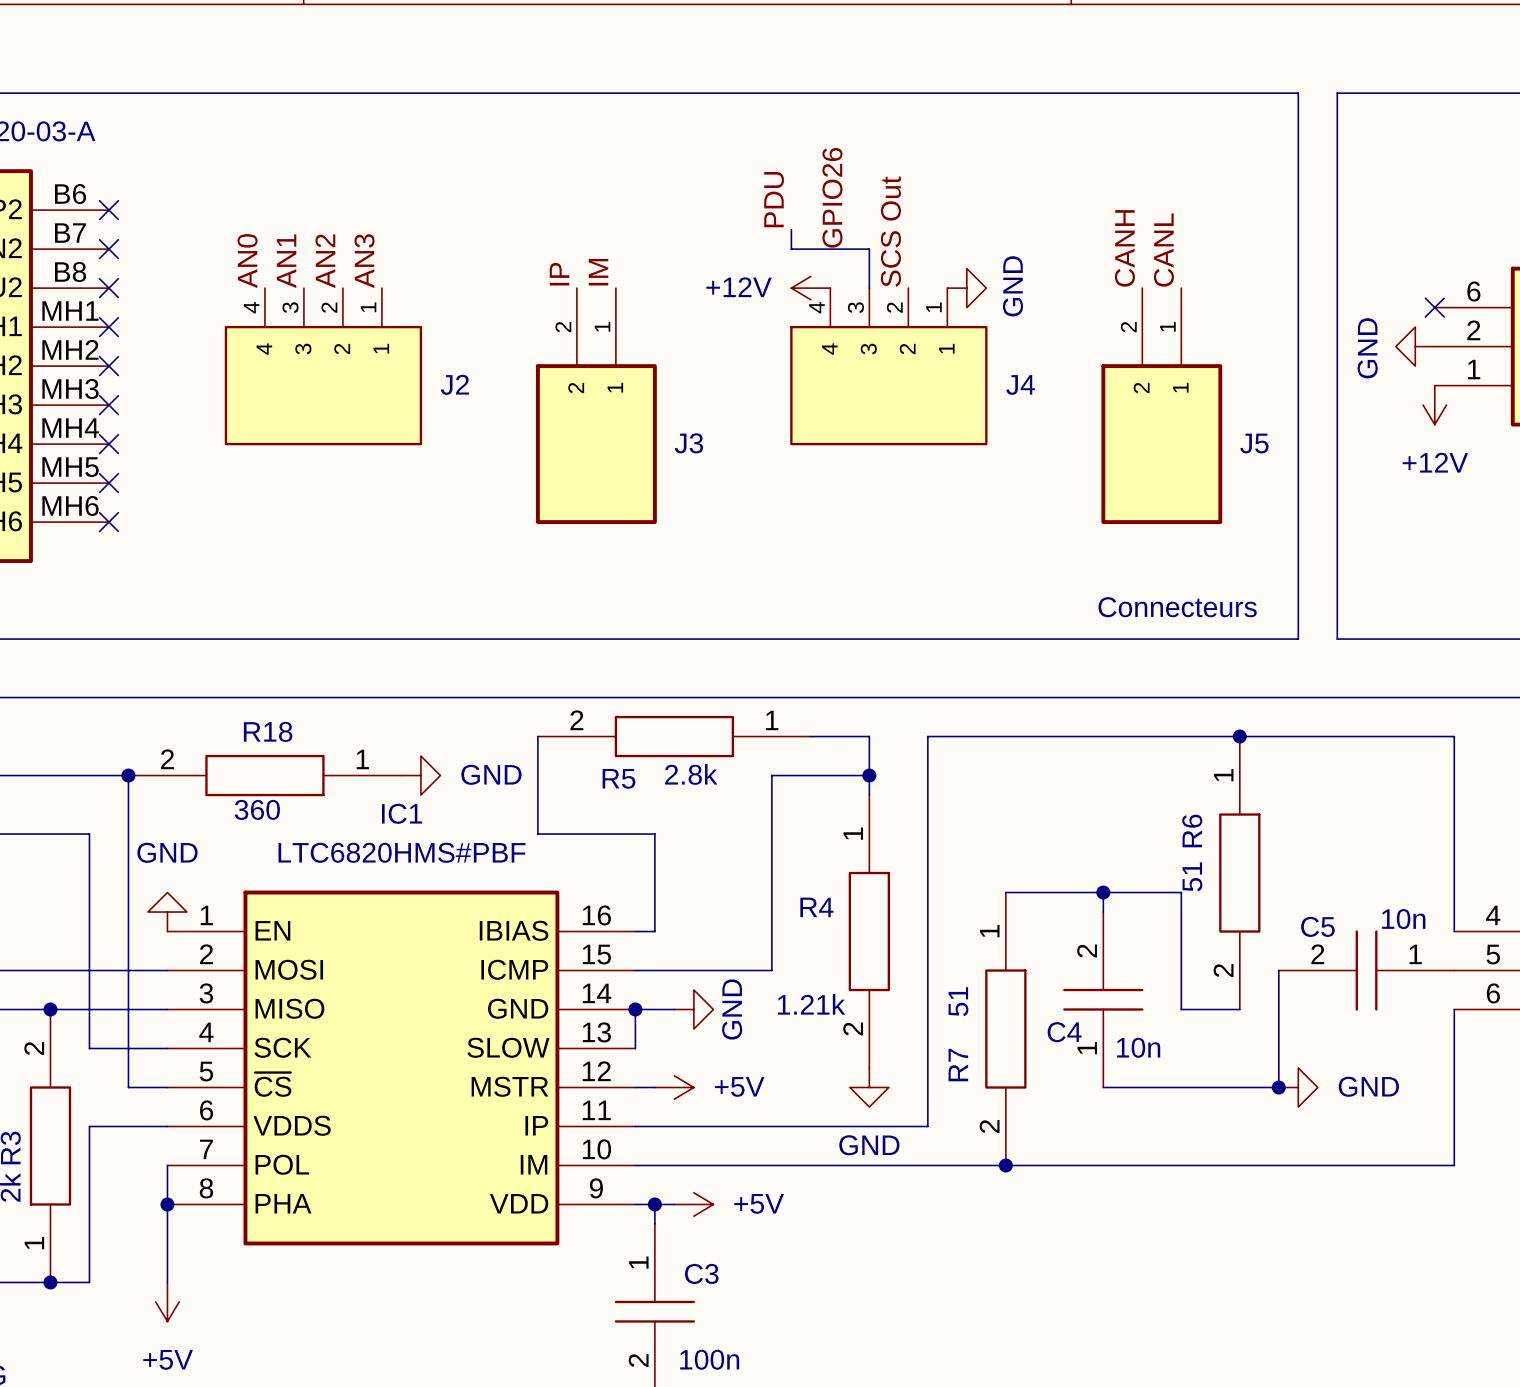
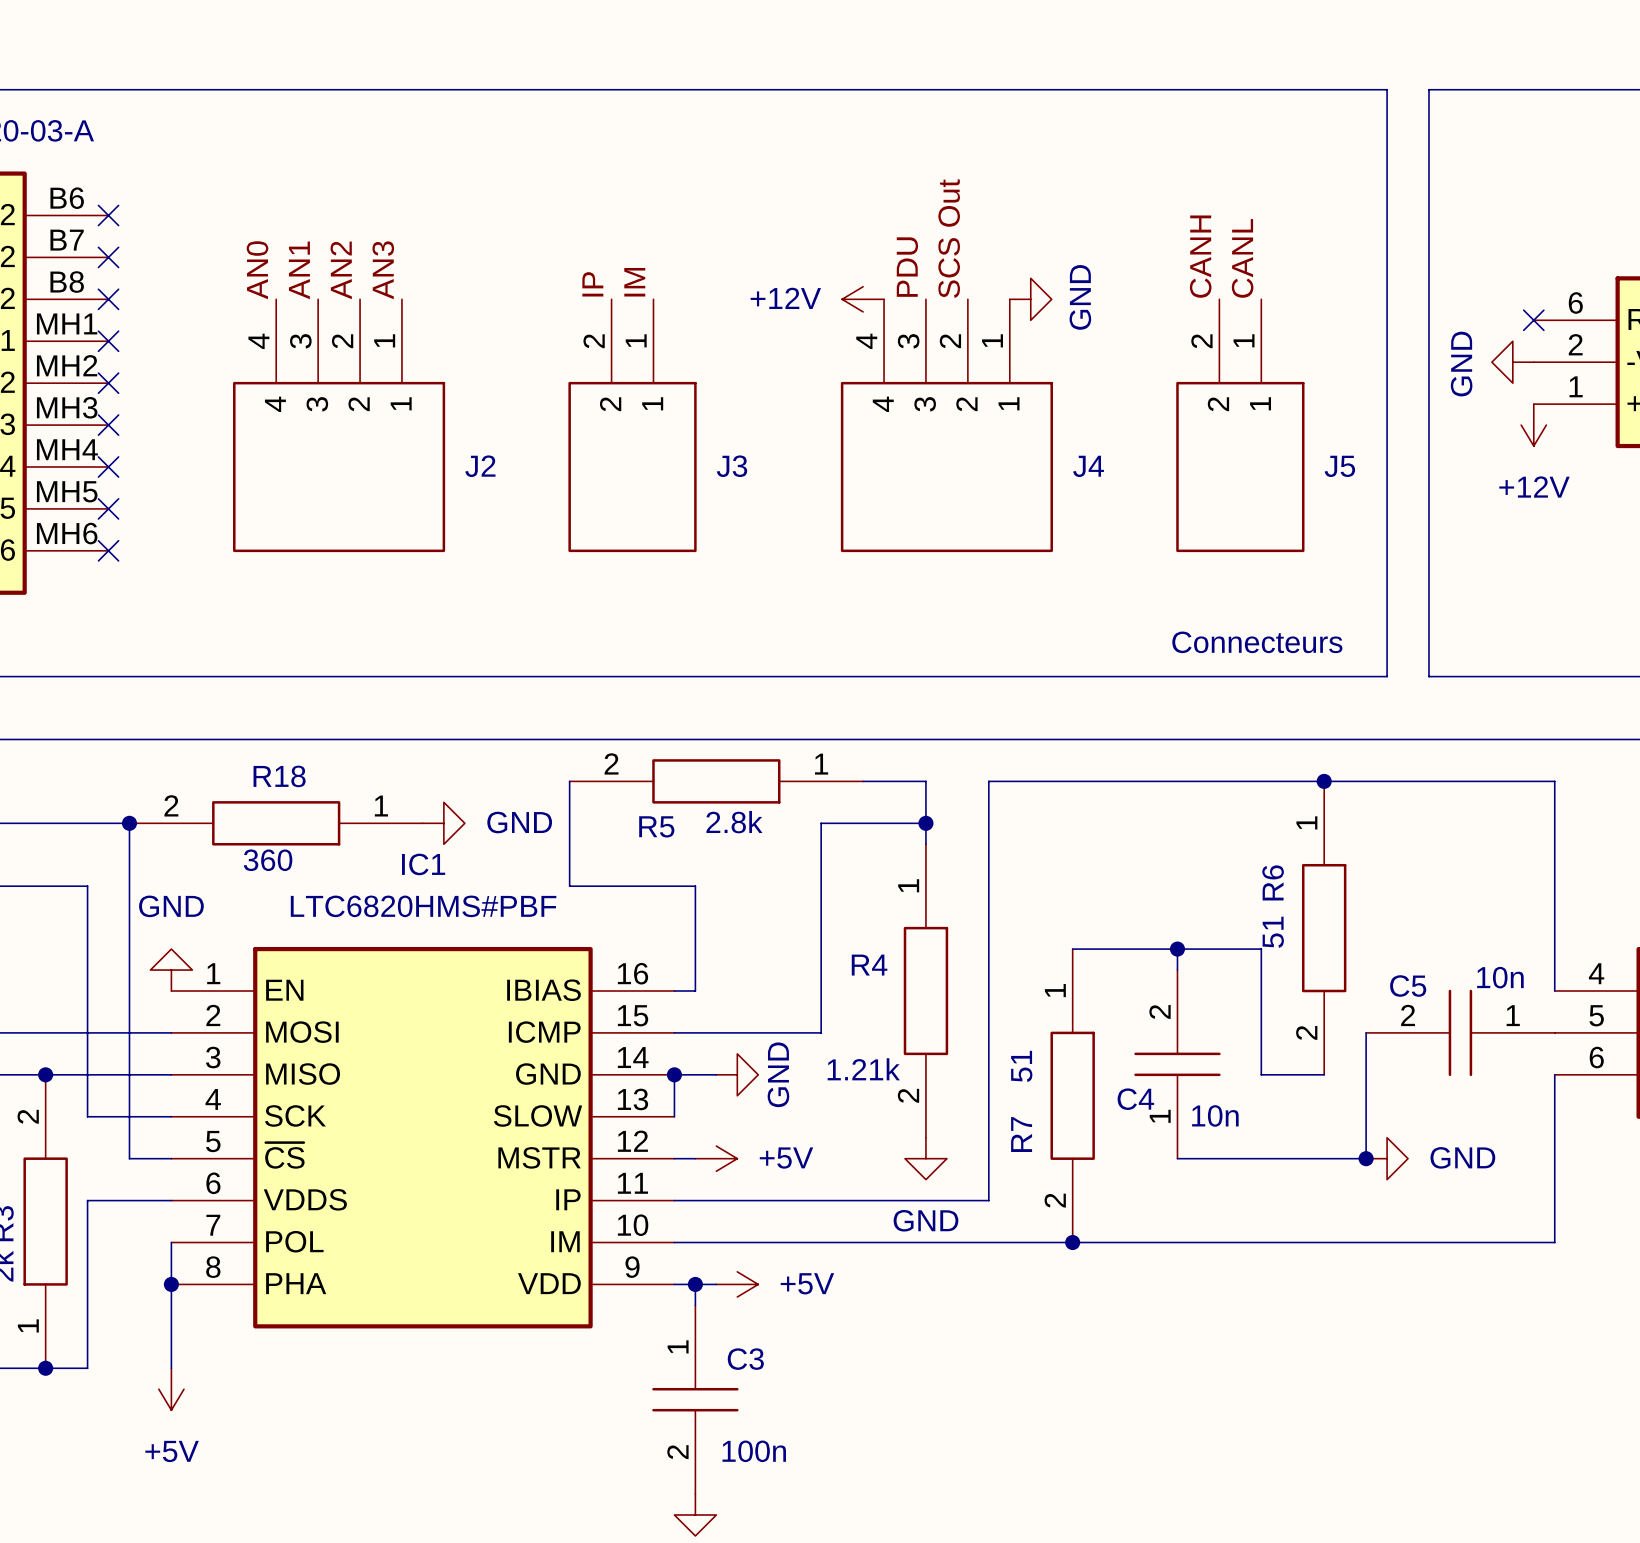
label: GPIO26 (832, 197) -> none
label position: PDU (774, 199) -> PDU (907, 267)
wire: (791, 229) (791, 249) (869, 249) (869, 288) -> none
J2 symbol: [224, 288, 423, 446] -> [233, 299, 446, 553]
J3 symbol: [535, 288, 657, 525] -> [568, 299, 697, 553]
J4 symbol: [790, 288, 988, 446] -> [840, 299, 1053, 553]
J5 symbol: [1101, 288, 1223, 525] -> [1176, 299, 1305, 553]

